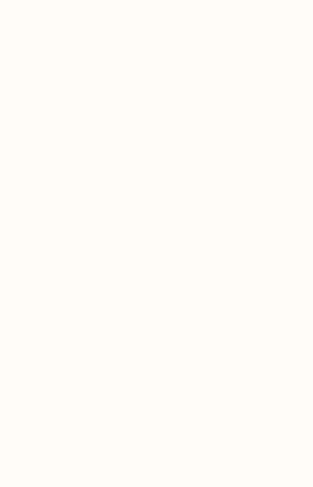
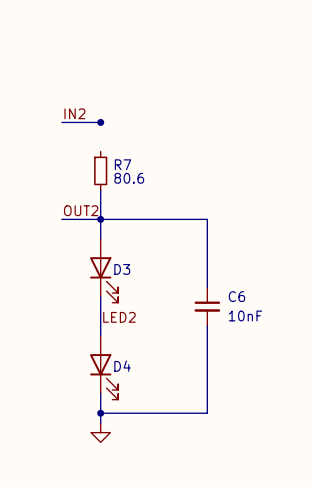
label: none -> IN2 (74, 113)
wire: none -> (61, 122) (100, 122)
junction: none -> (100, 122)
R7: none -> 80.6 (100, 170)
wire: none -> (100, 190) (100, 238)
label: none -> OUT2 (81, 210)
wire: none -> (61, 219) (207, 219) (207, 287)
junction: none -> (100, 219)
D3: none -> (104, 270)
wire: none -> (100, 296) (100, 335)
C6: none -> 10nF (207, 306)
label: none -> LED2 (119, 317)
wire: none -> (207, 326) (207, 413) (100, 413)
D4: none -> (104, 367)
wire: none -> (100, 393) (100, 422)
junction: none -> (100, 413)
power symbol: none -> (100, 432)

